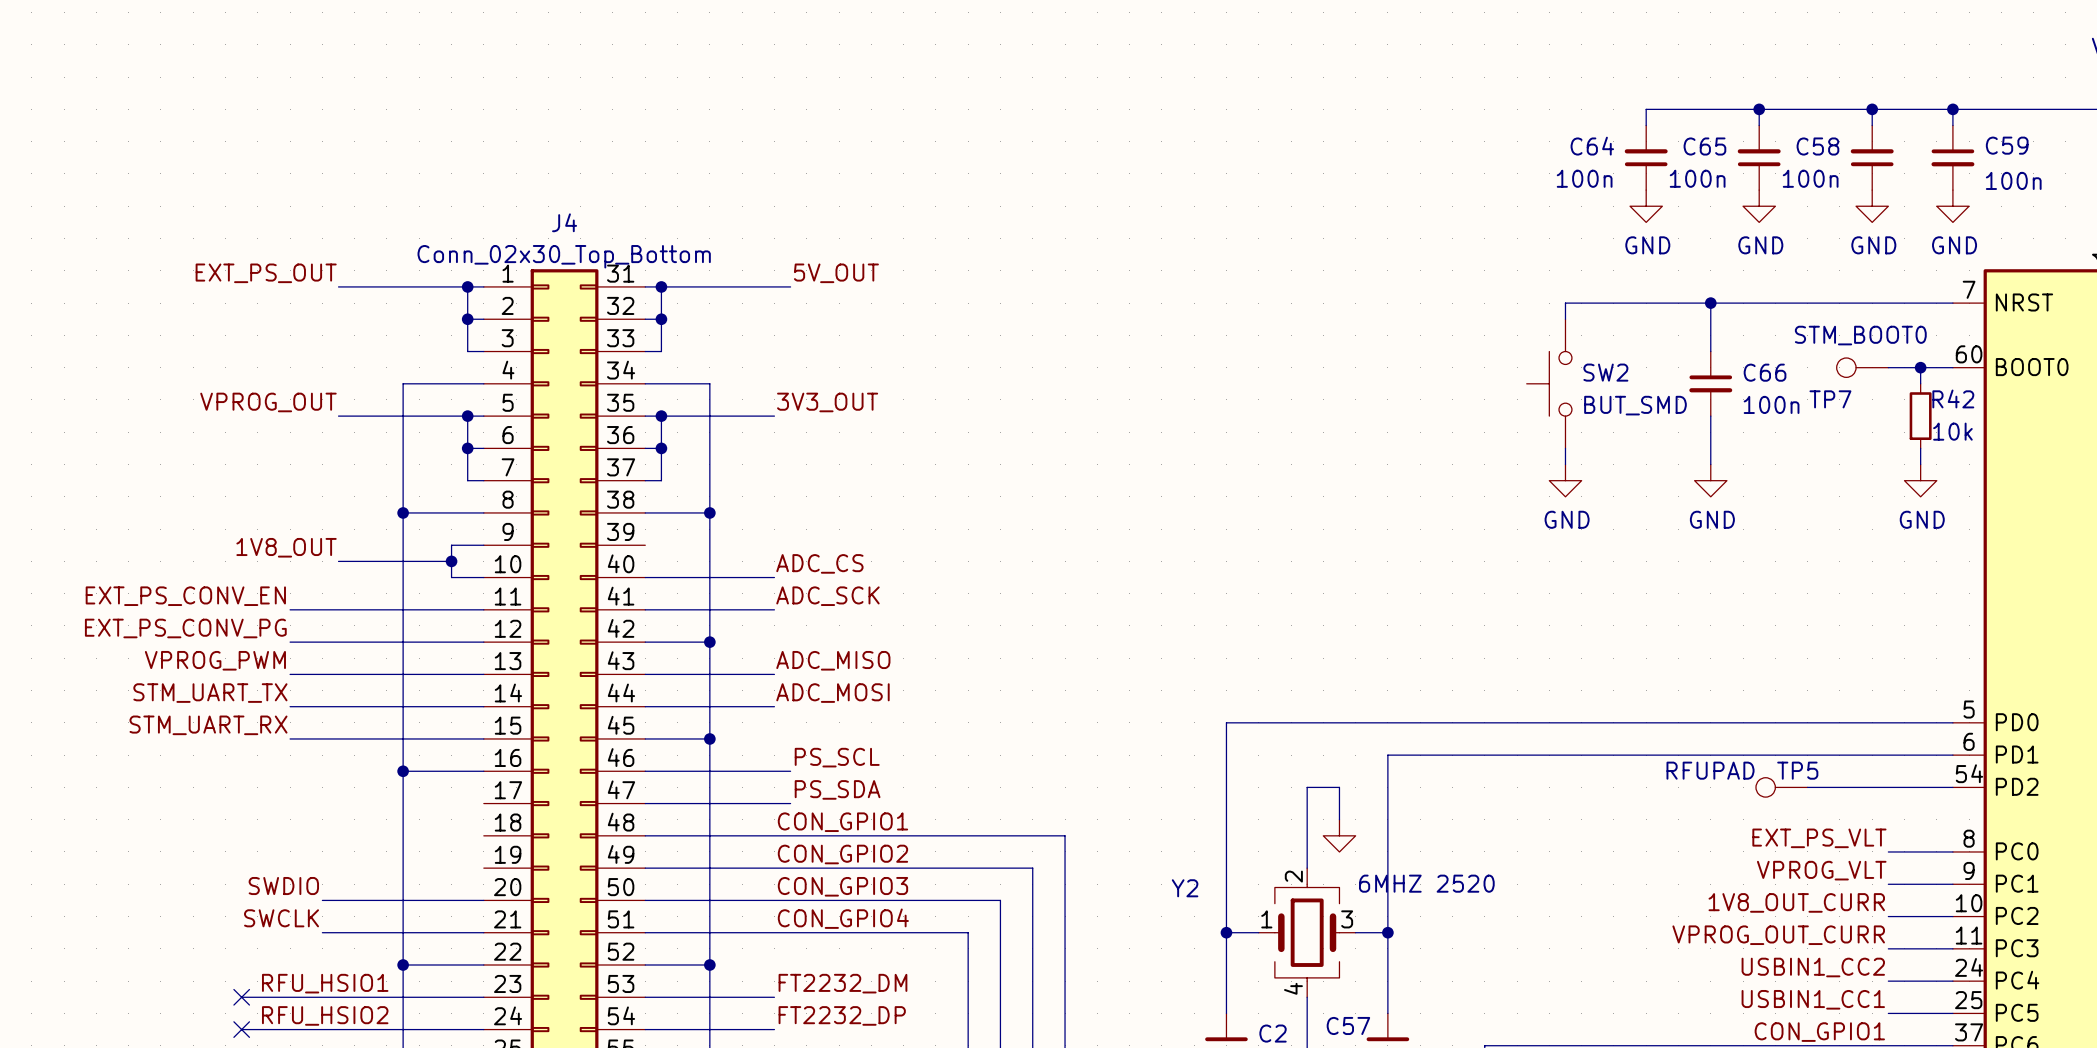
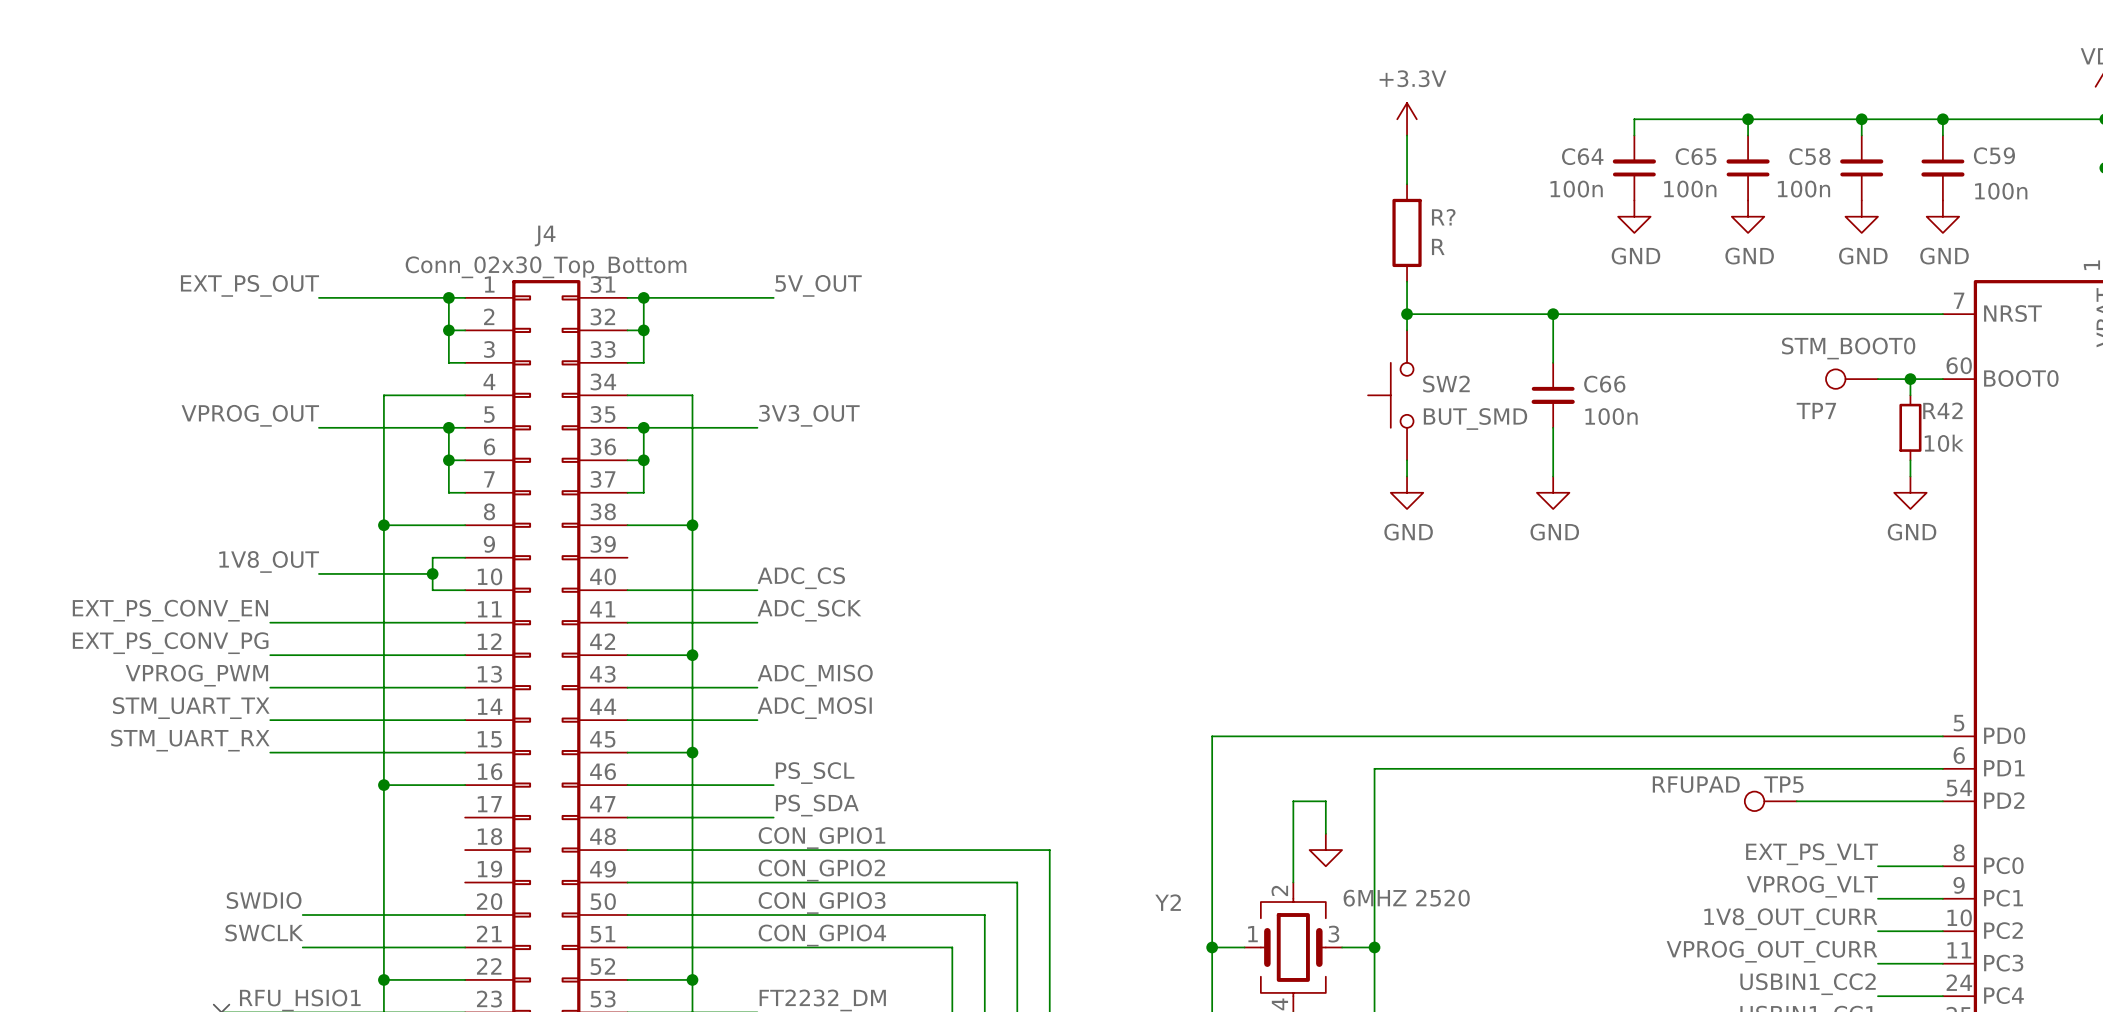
power symbol: none -> +3.3V (1407, 119)
wire: none -> (1407, 135) (1407, 184)
R?: none -> R (1407, 232)
wire: none -> (1407, 314) (1553, 314)
junction: none -> (1407, 314)
junction: none -> (1553, 314)
wire: (1710, 303) (1710, 351) -> (1407, 281) (1407, 330)
junction: (1710, 303) -> none
SW2 position: (1549, 383) -> (1390, 395)
C66 position: (1710, 383) -> (1553, 395)
wire: (1710, 416) (1710, 464) -> none
wire: none -> (1407, 460) (1407, 476)
power symbol position: GND (1710, 480) -> GND (1407, 492)

